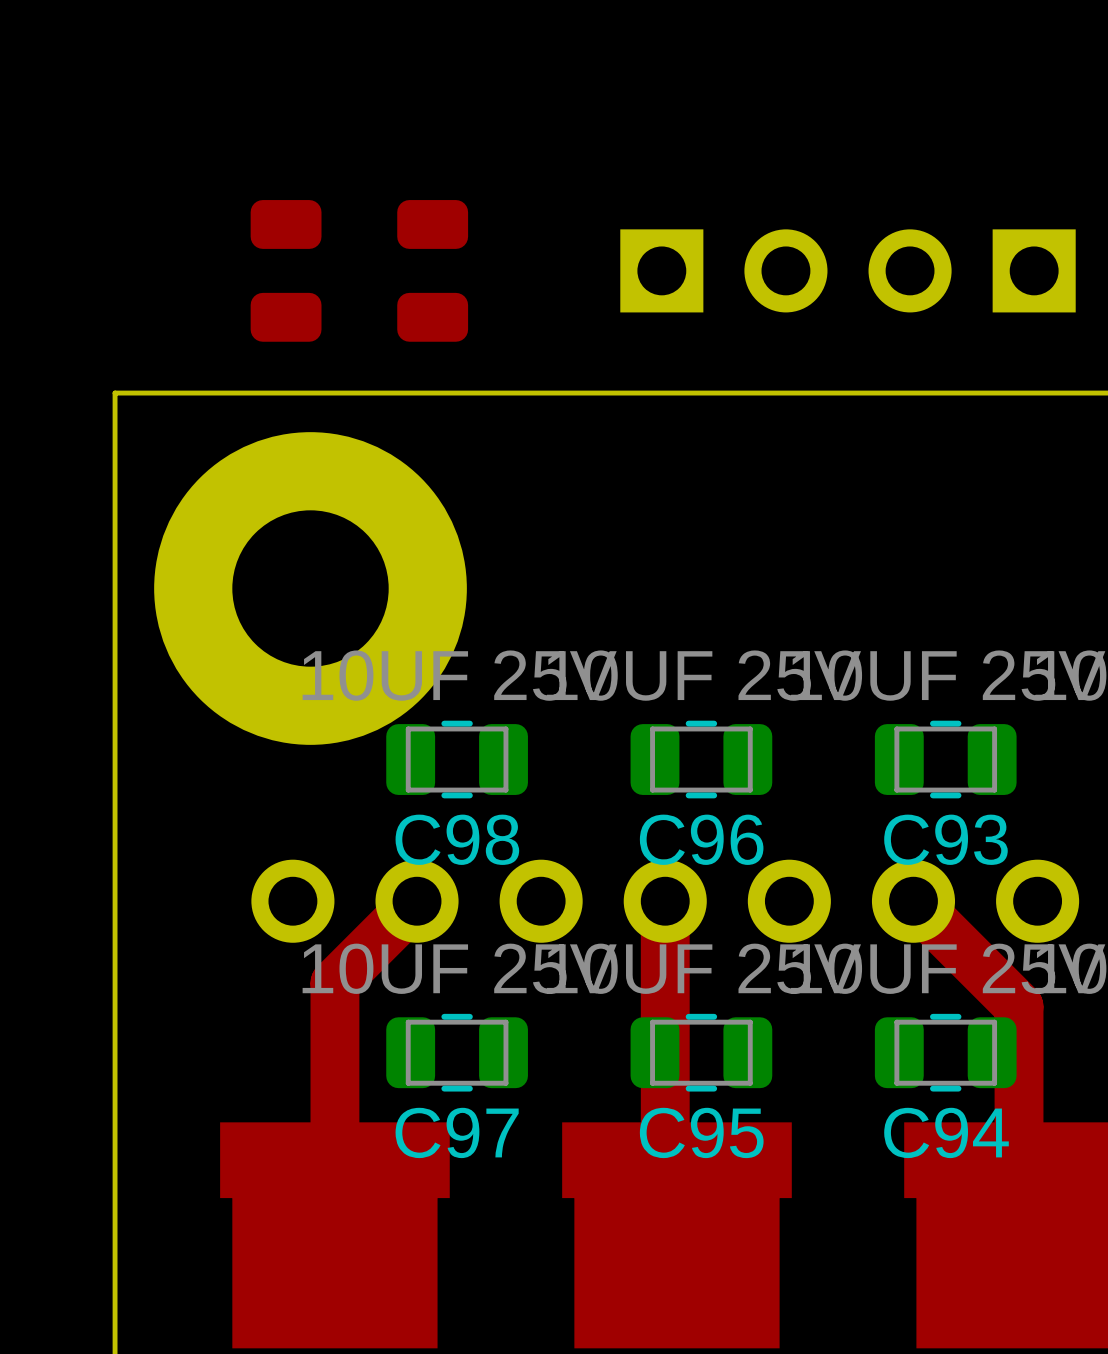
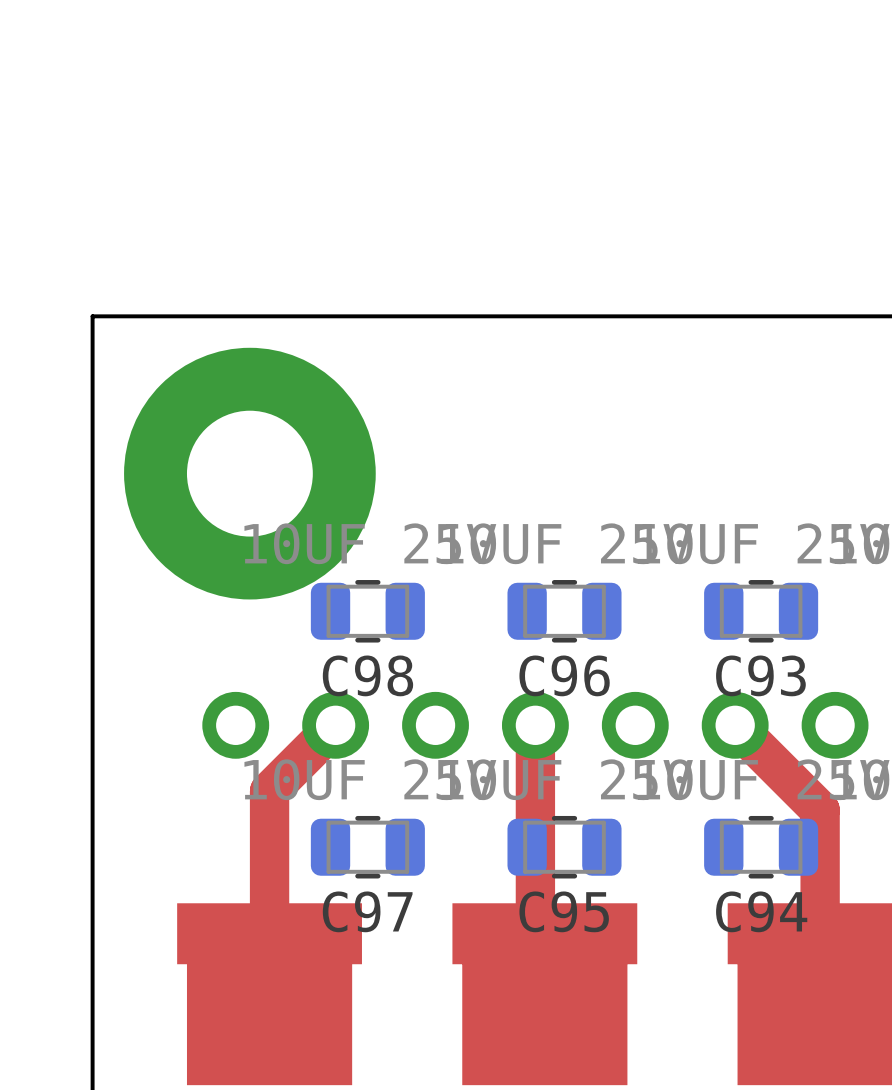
part: (286, 270) -> none
part: (432, 270) -> none
part: (723, 270) -> none
part: (972, 270) -> none

